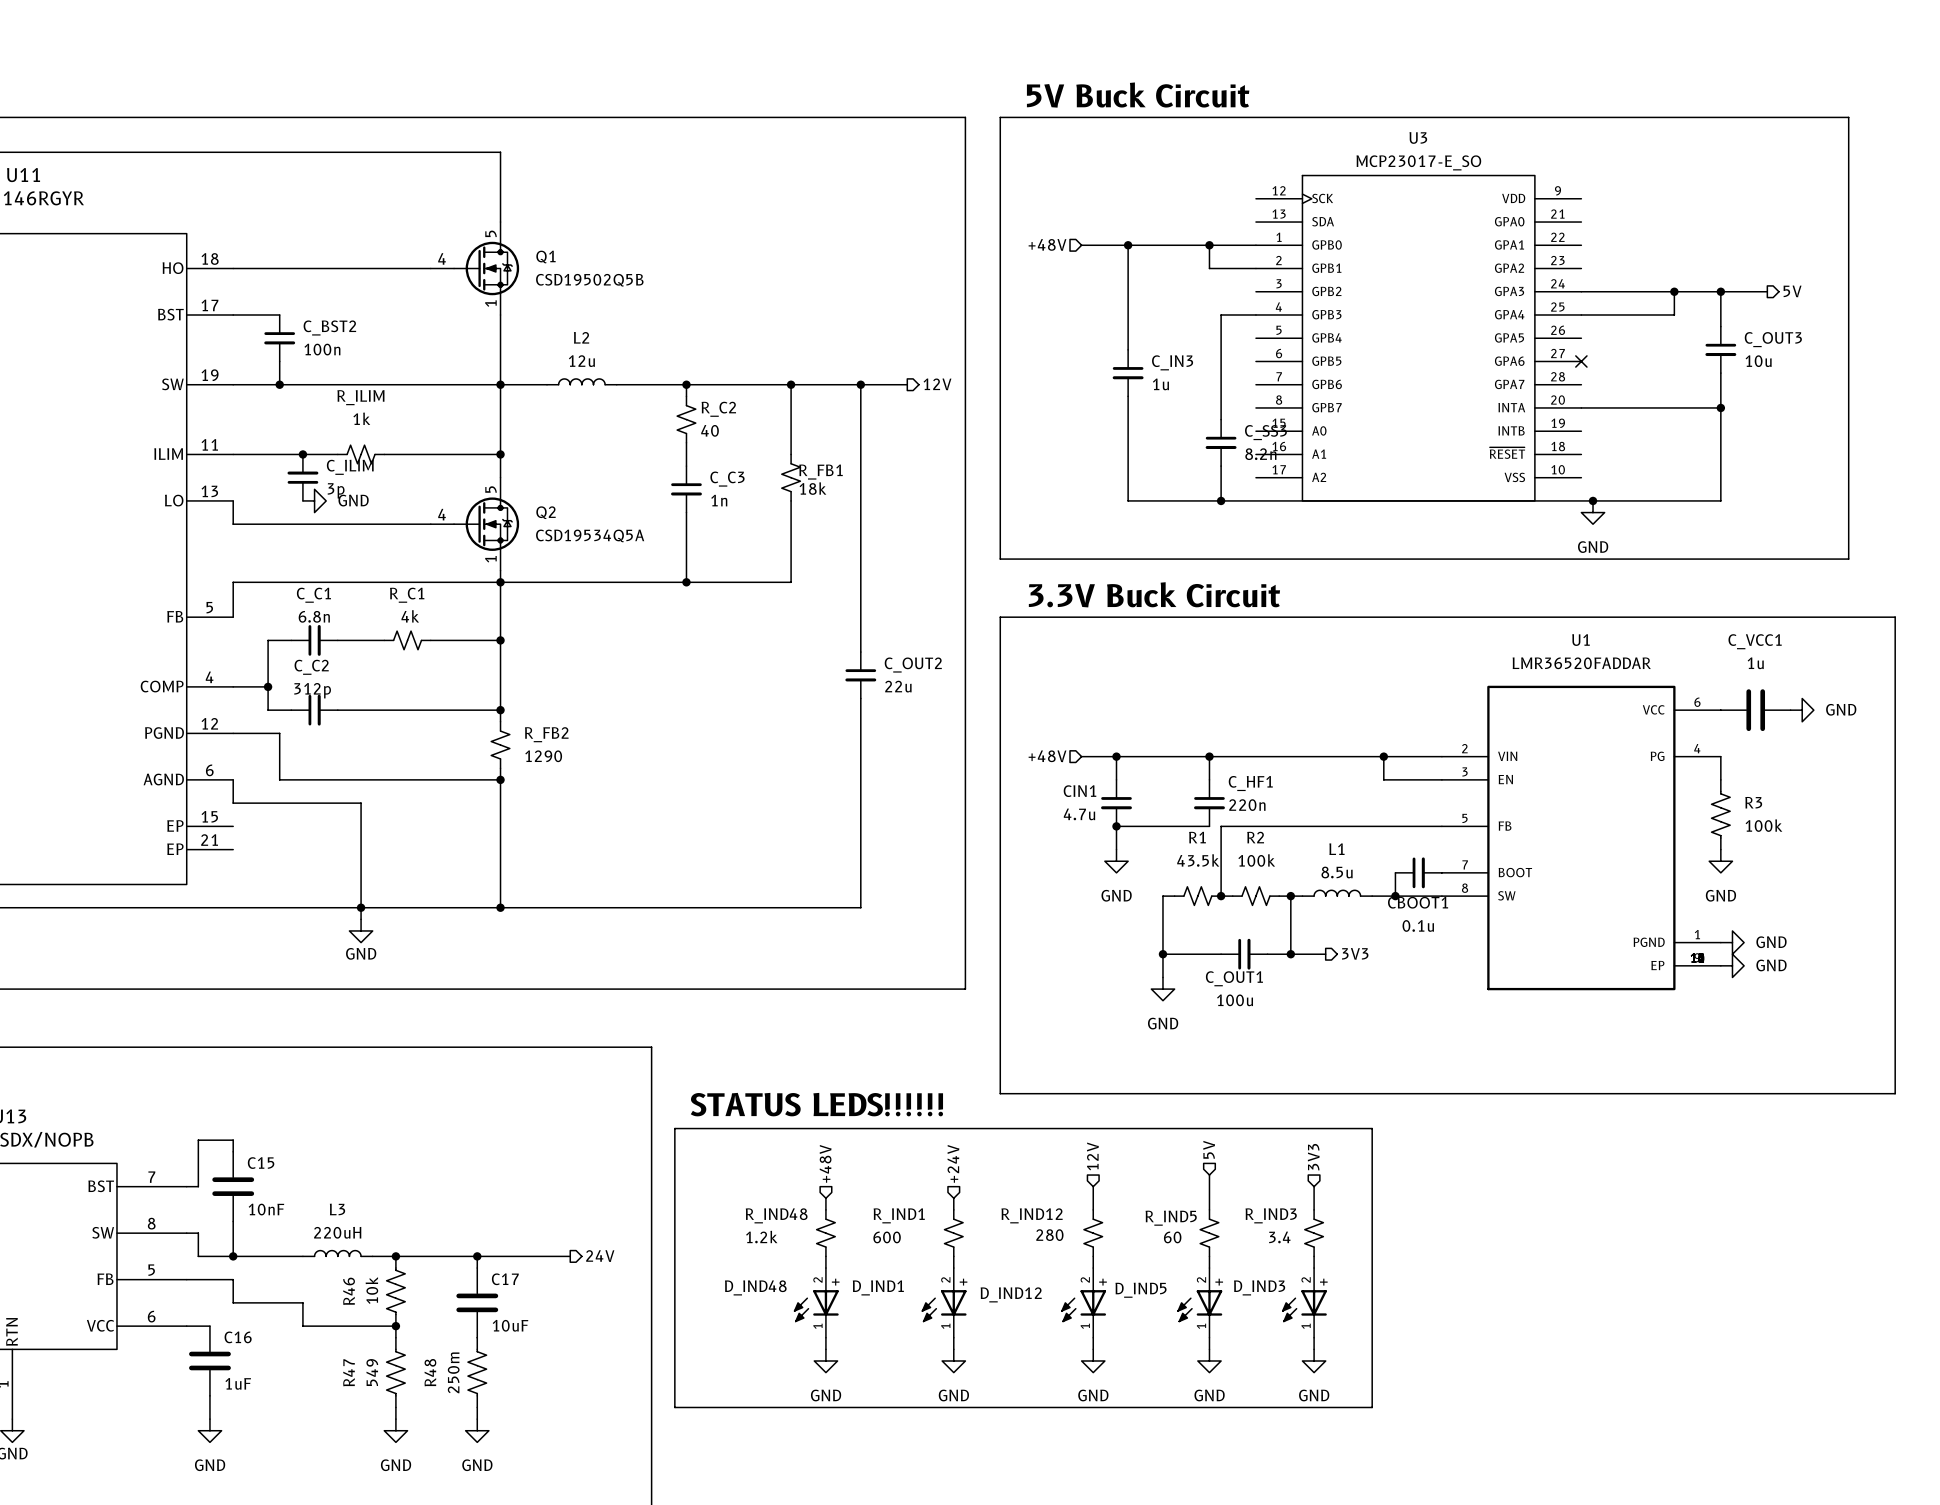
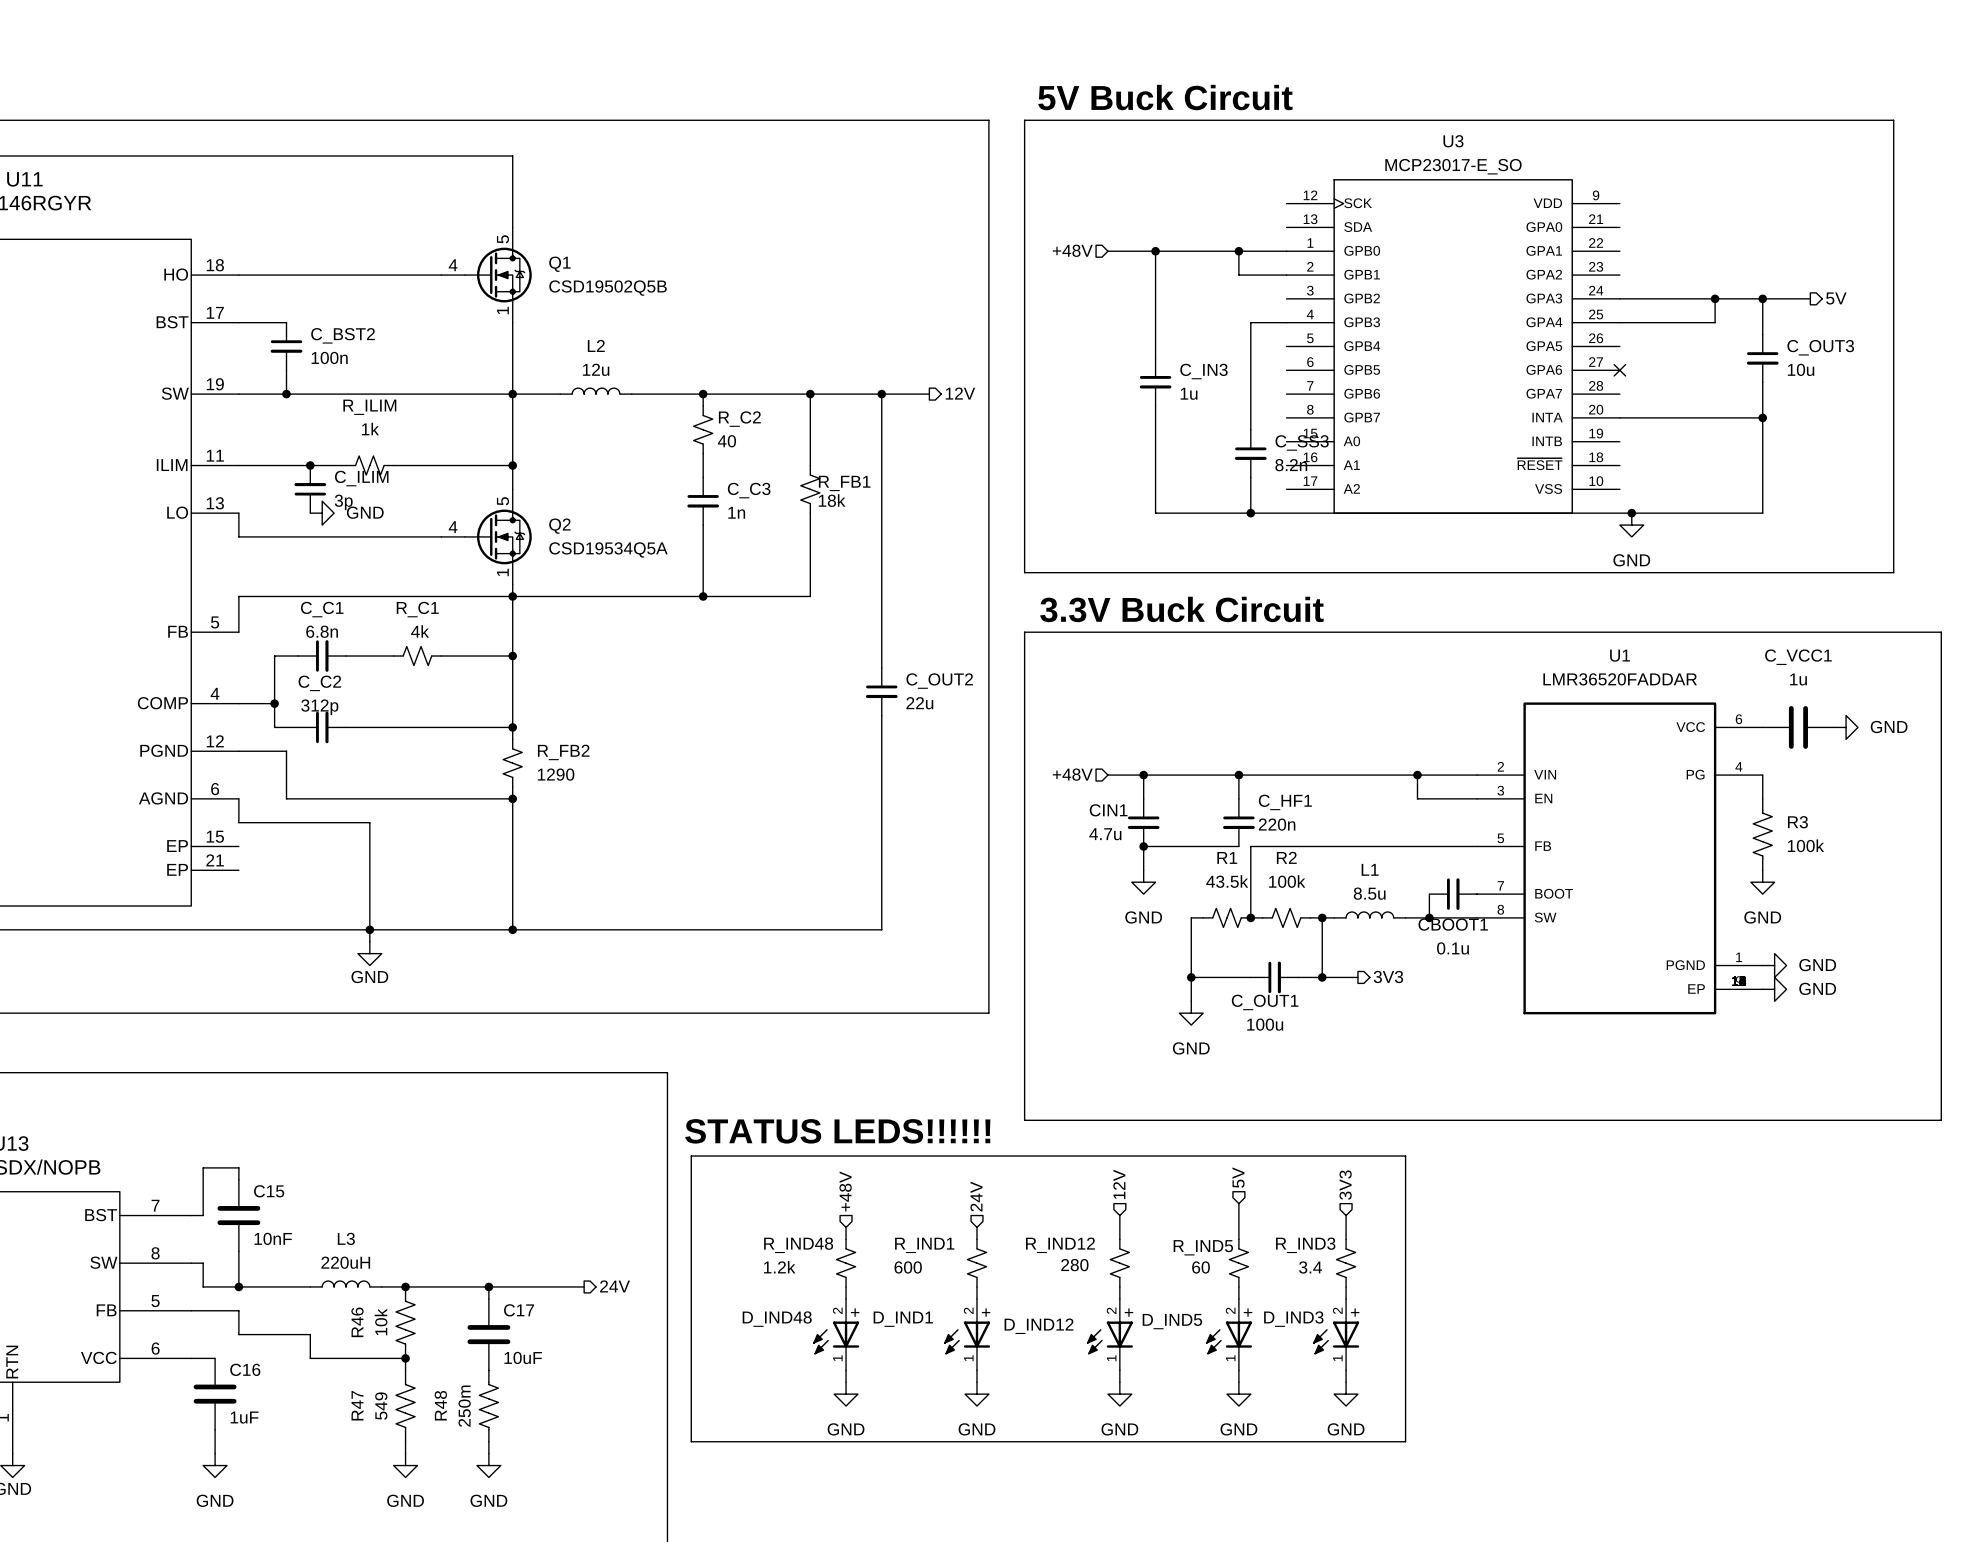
hierarchical label: +24V (953, 1163) -> 24V (976, 1196)

